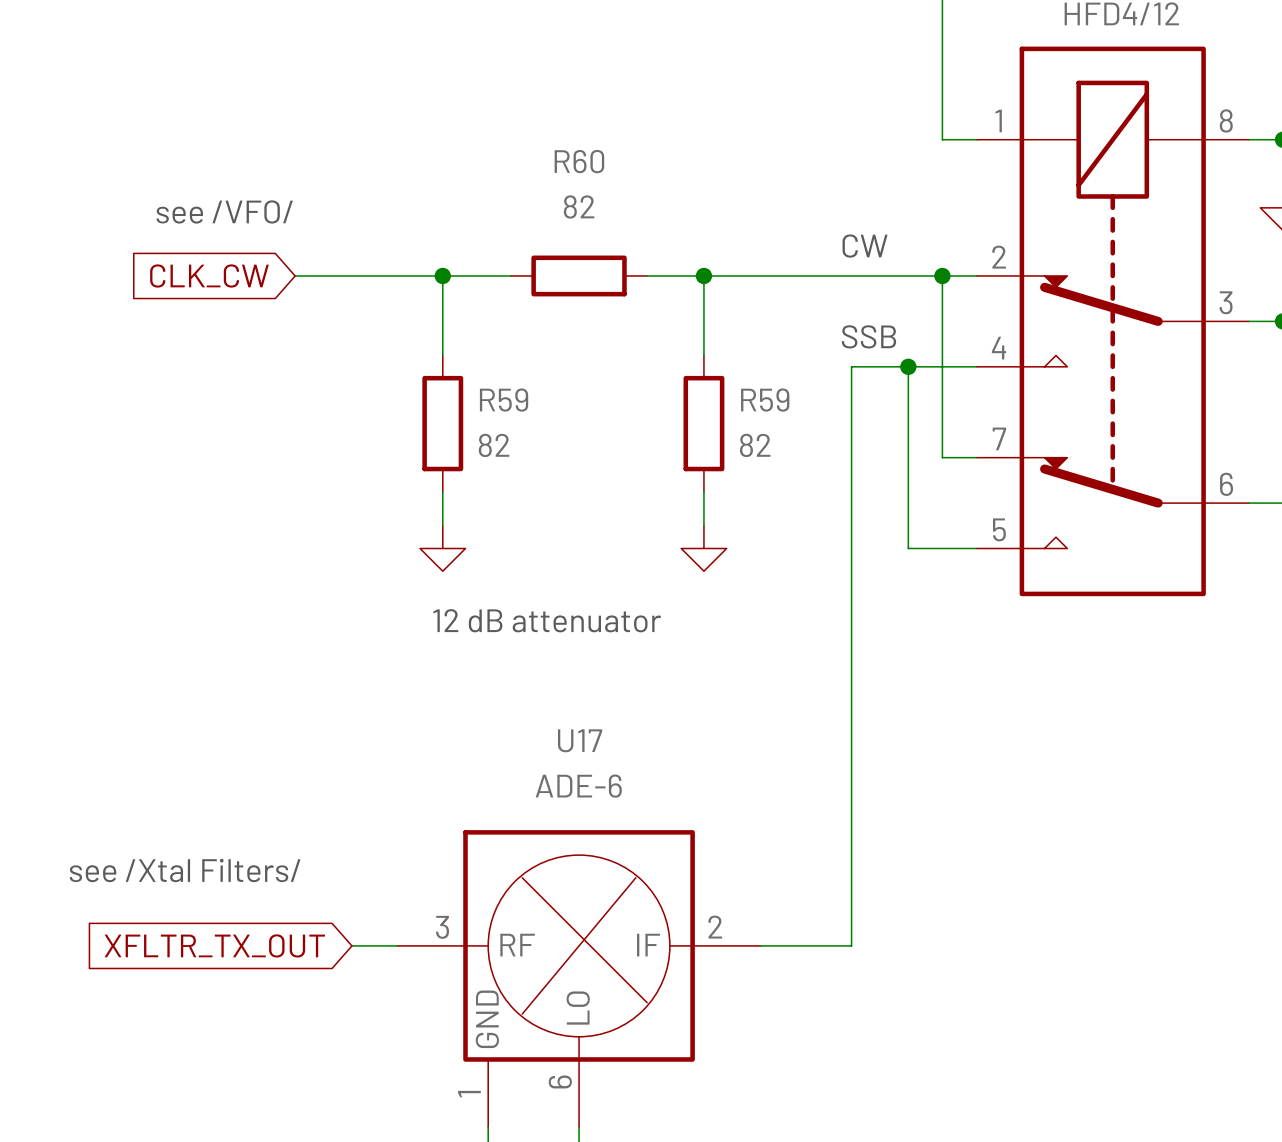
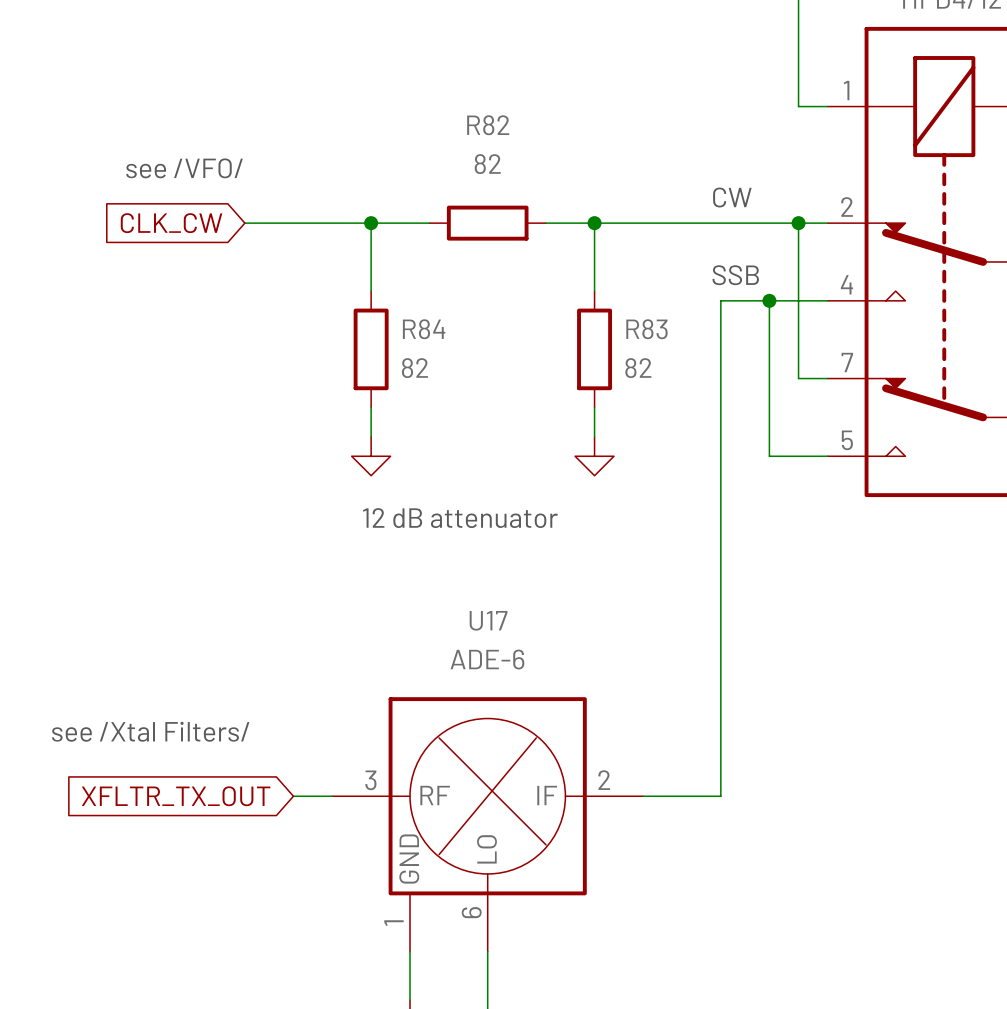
R60 name: R60 (579, 161) -> R82 (488, 125)
R59 name: R59 (504, 400) -> R84 (424, 329)
R59 name: R59 (765, 400) -> R83 (646, 329)

